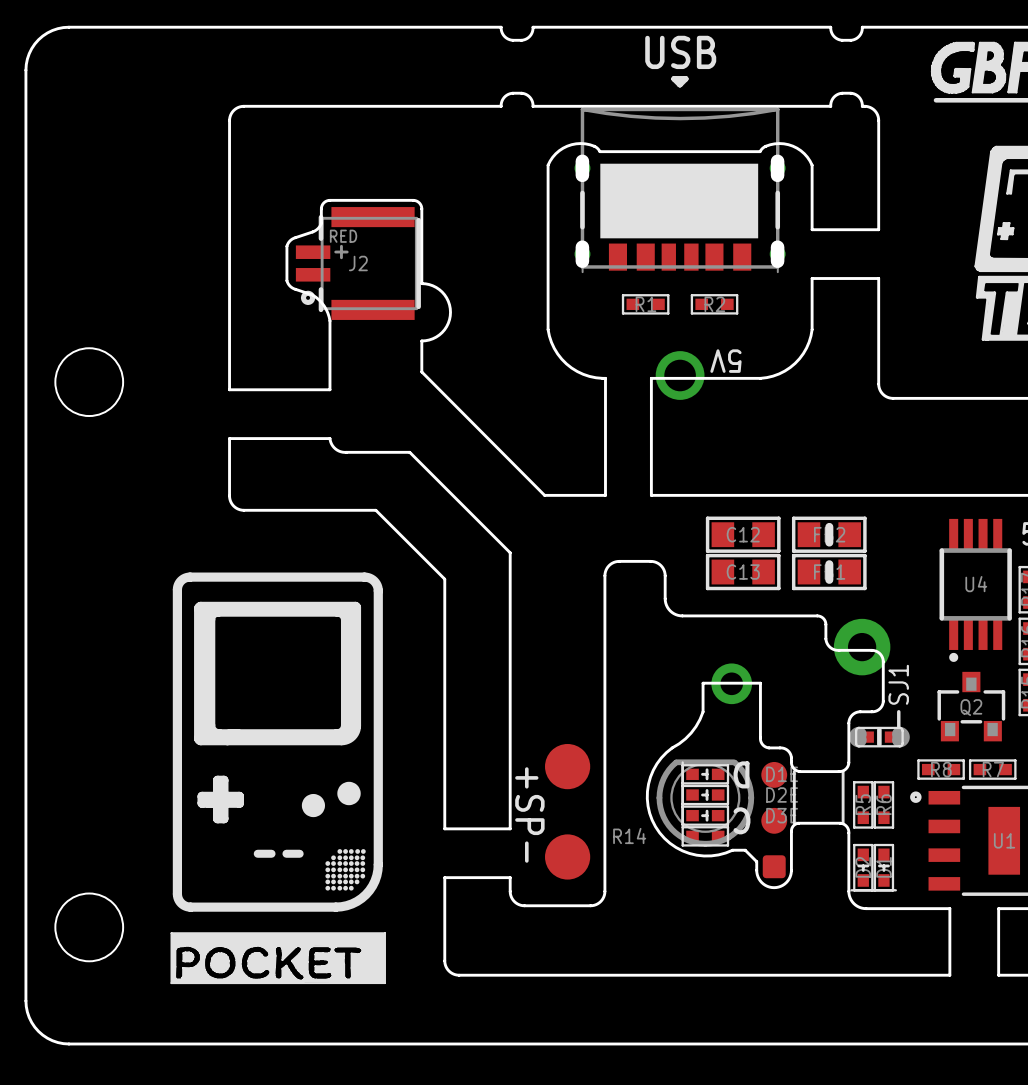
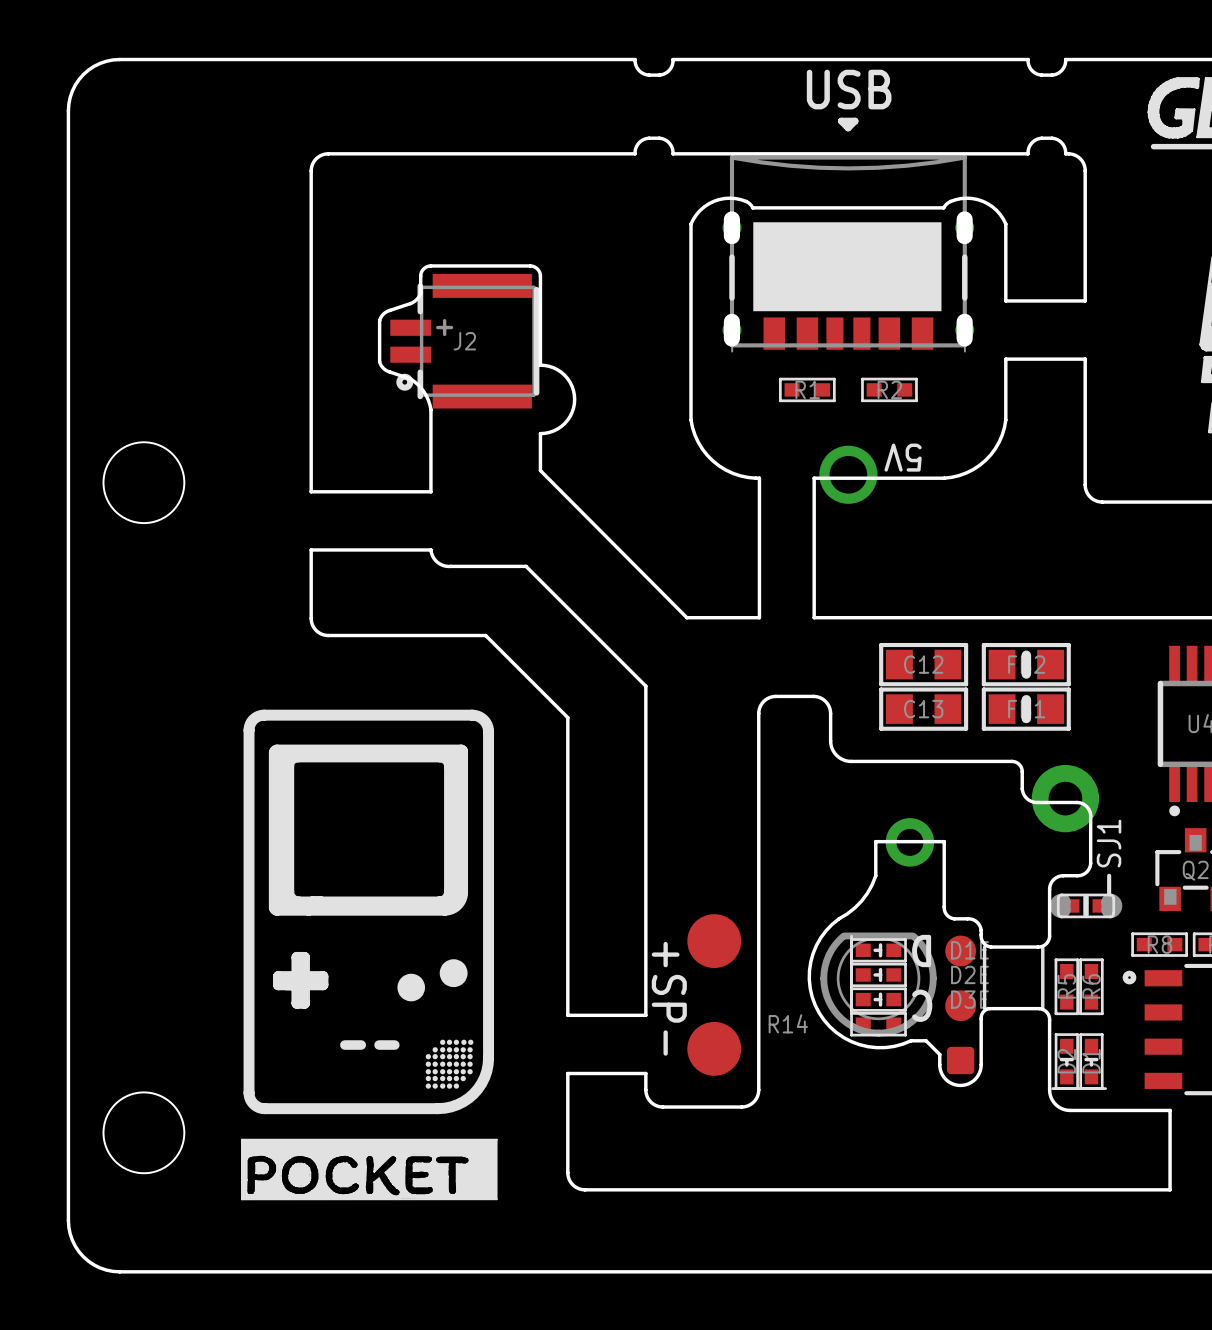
J2 text: RED (343, 236) -> none

